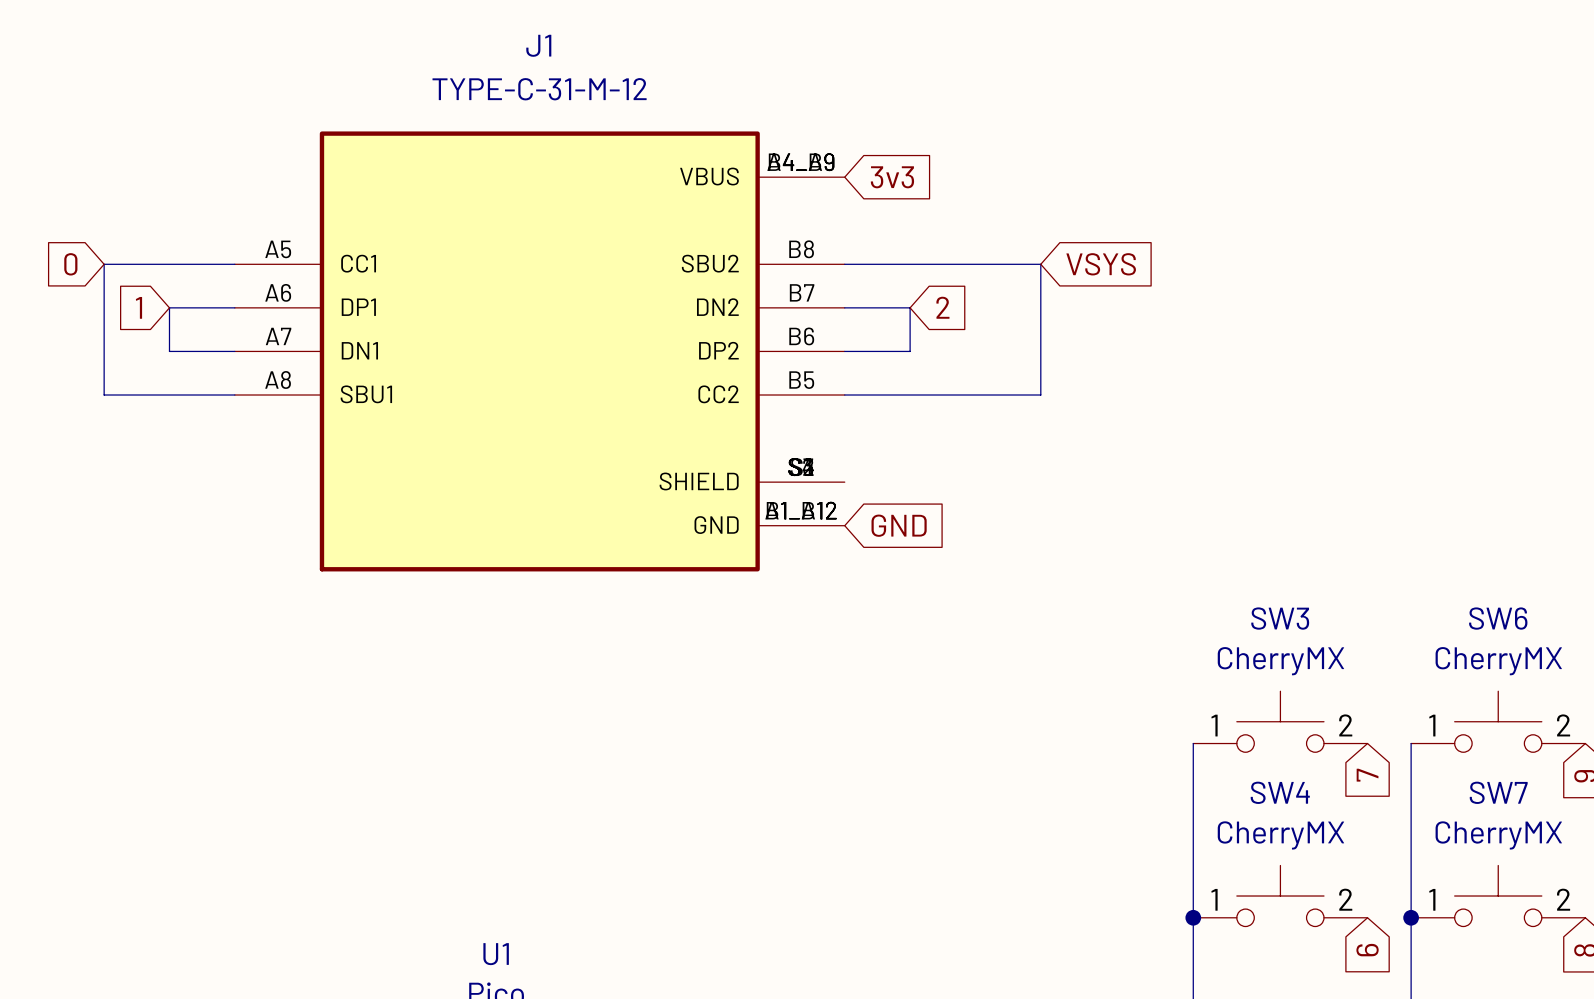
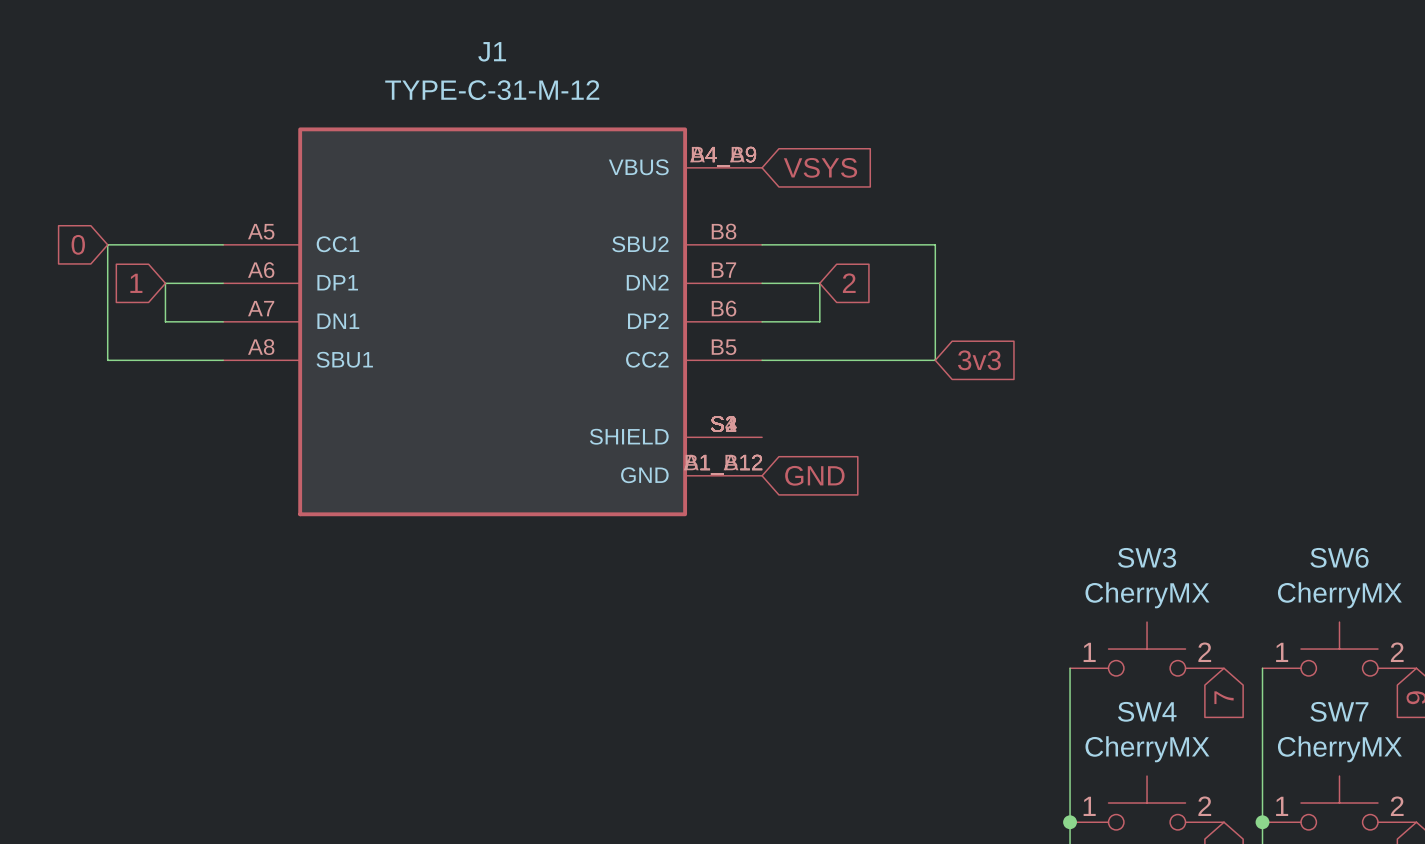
global label: 3v3 (892, 177) -> VSYS (820, 167)
global label: VSYS (1101, 264) -> none
global label: none -> 3v3 (979, 360)

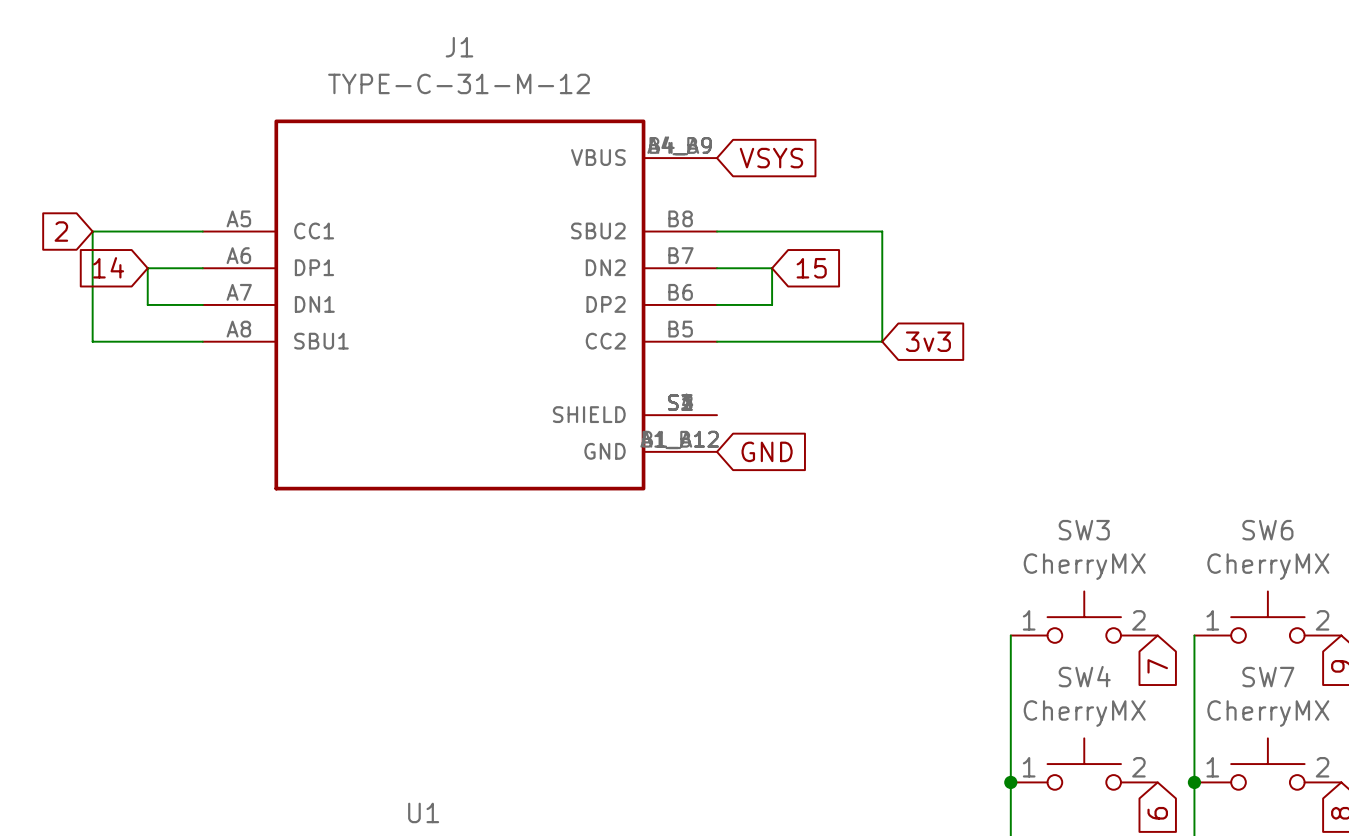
global label: 0 (78, 244) -> 2 (61, 231)
global label: 1 (136, 283) -> 14 (108, 267)
global label: 2 (849, 283) -> 15 (811, 268)

